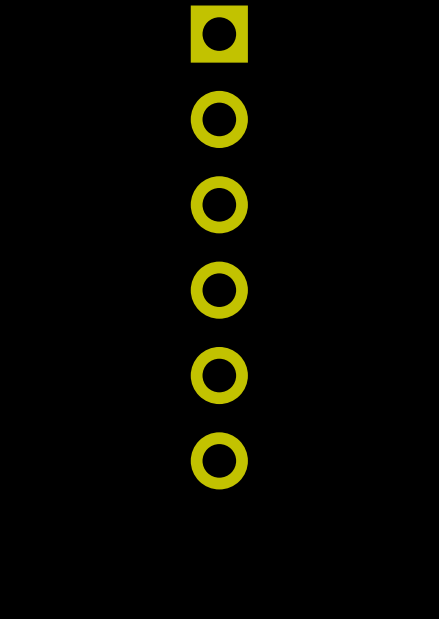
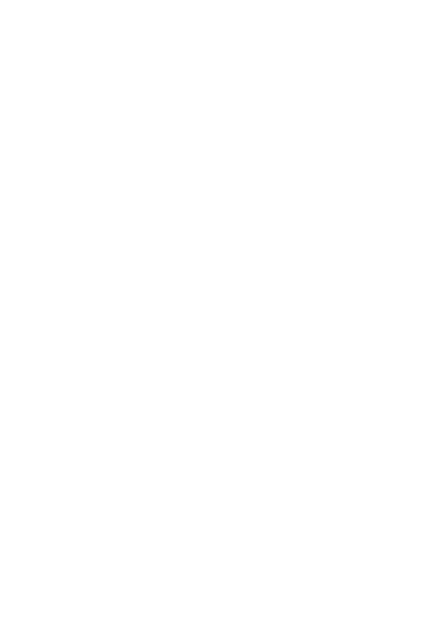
part: (219, 247) -> none

